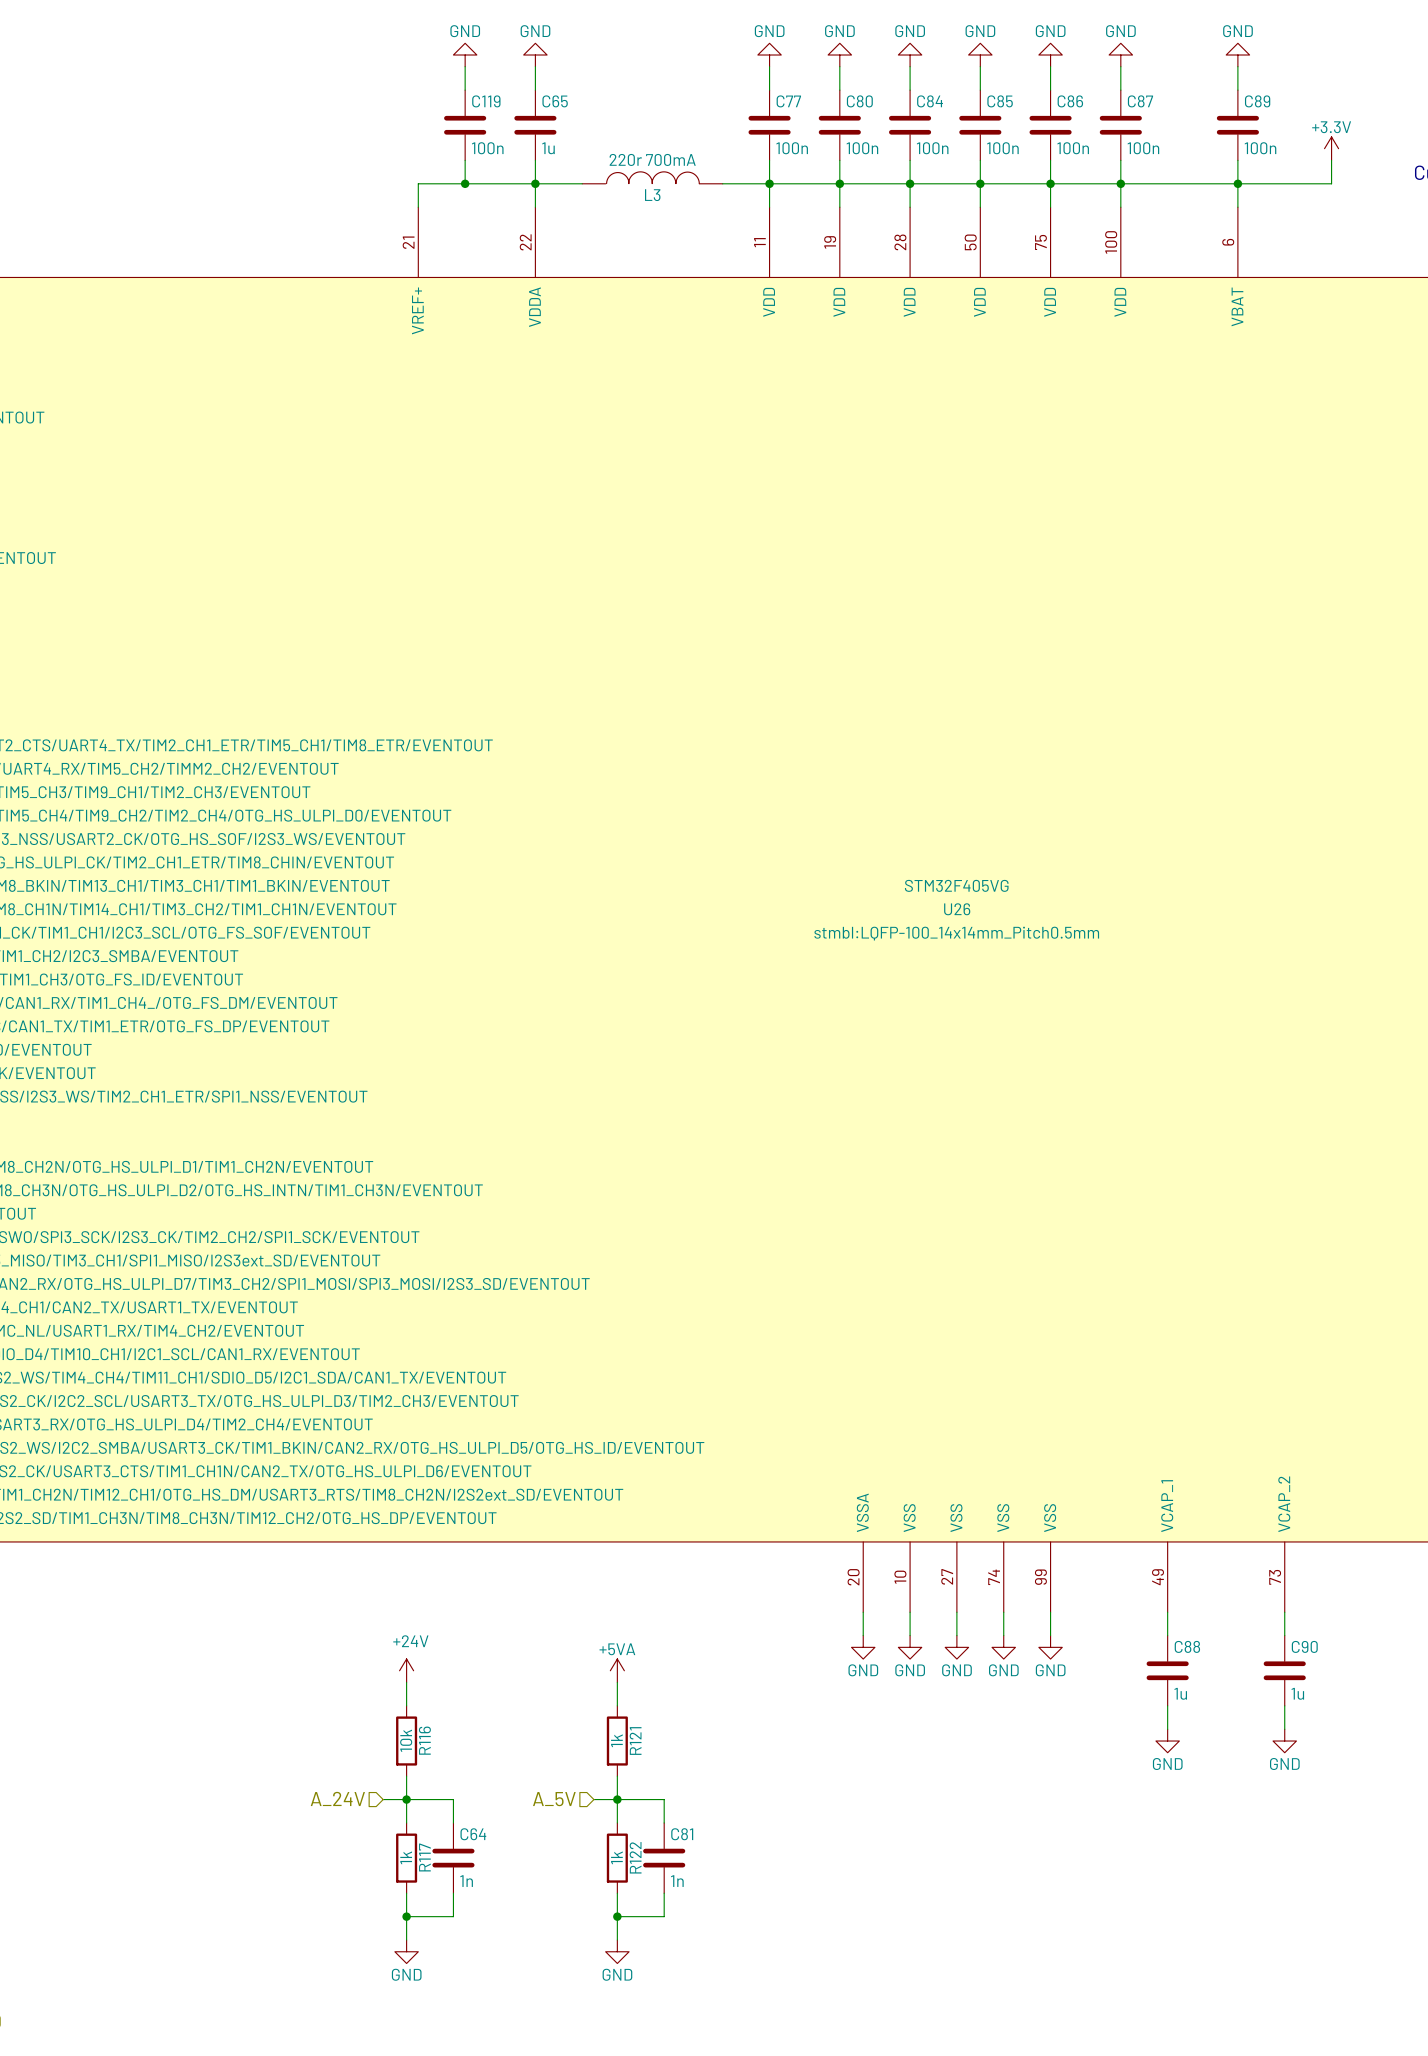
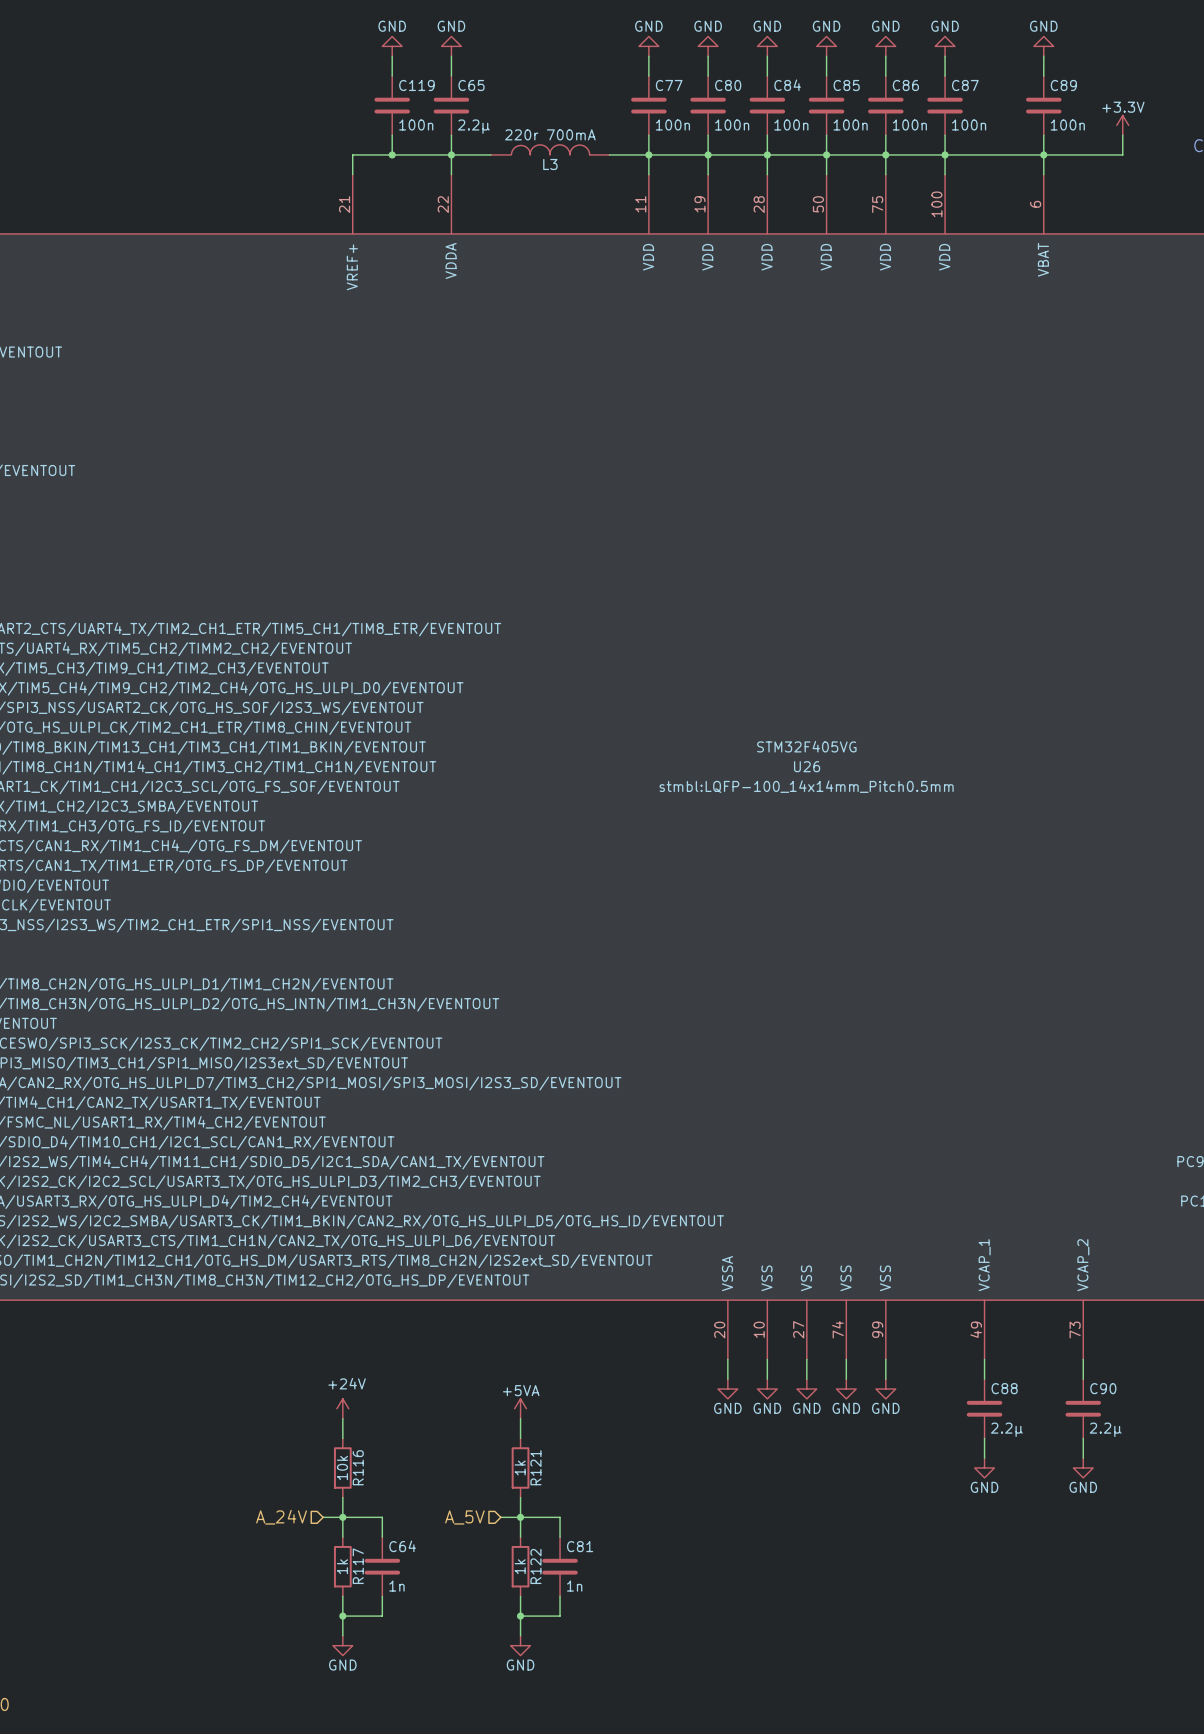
C65 value: 1u (548, 148) -> 2.2µ (473, 126)
C88 value: 1u (1180, 1693) -> 2.2µ (1006, 1429)
C90 value: 1u (1297, 1693) -> 2.2µ (1105, 1429)

